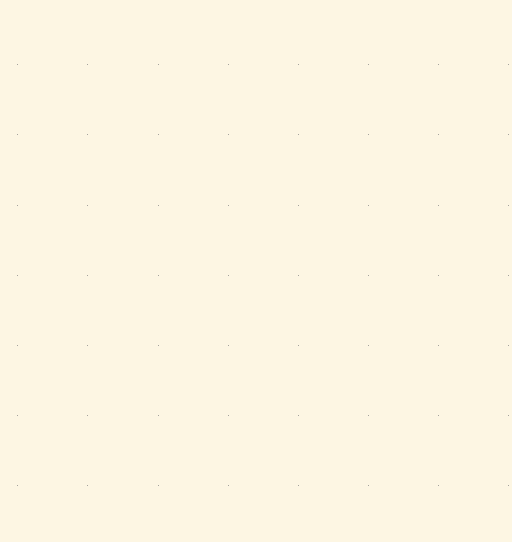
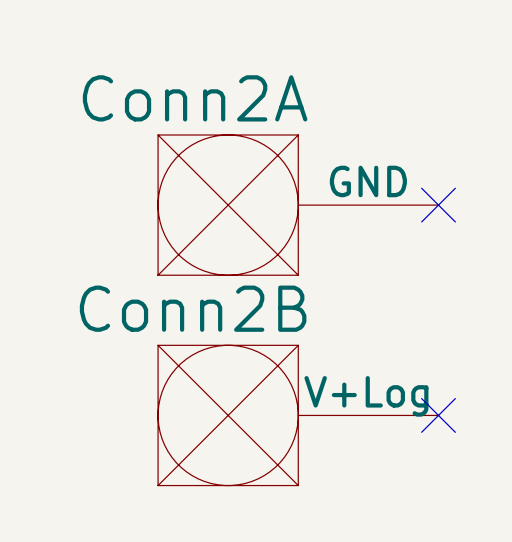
Conn2A: none -> (298, 205)
no-connect mark: none -> (438, 205)
Conn2B: none -> (298, 415)
no-connect mark: none -> (438, 415)

